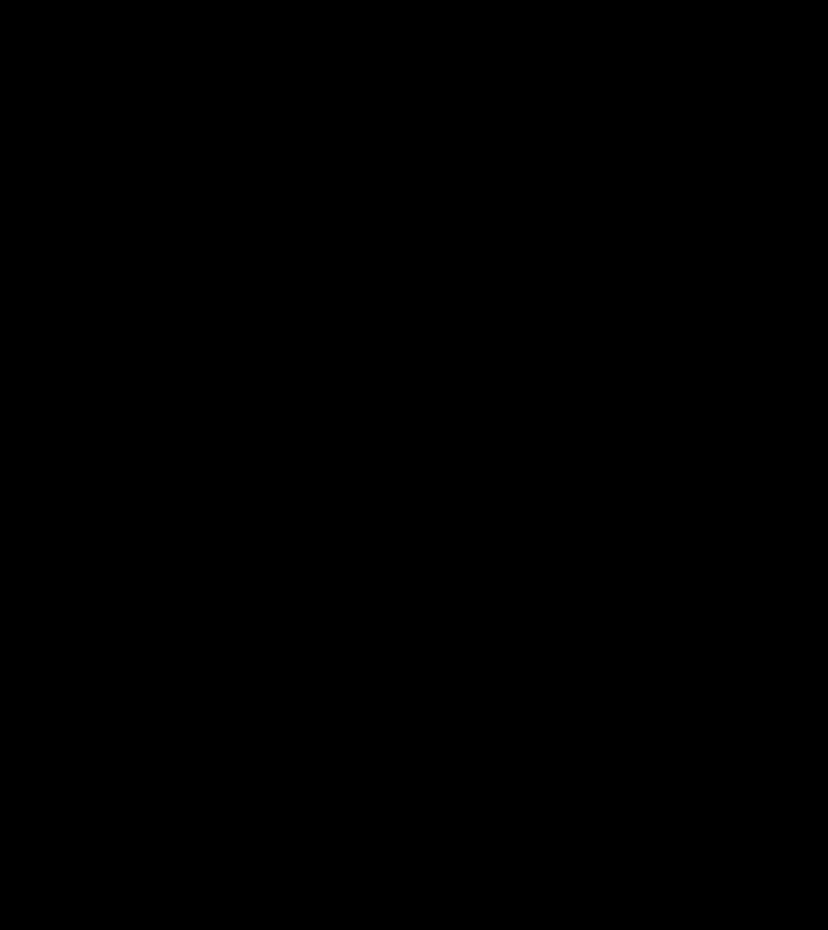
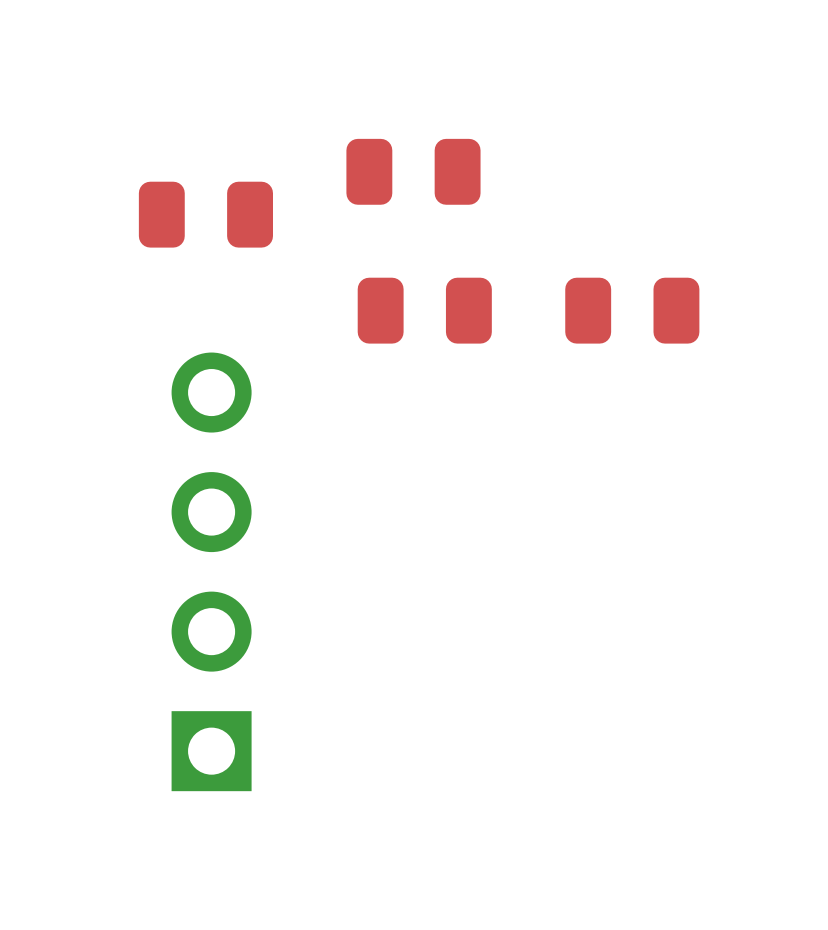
part: none -> (413, 171)
part: none -> (205, 214)
part: none -> (424, 310)
part: none -> (632, 310)
part: none -> (211, 571)

